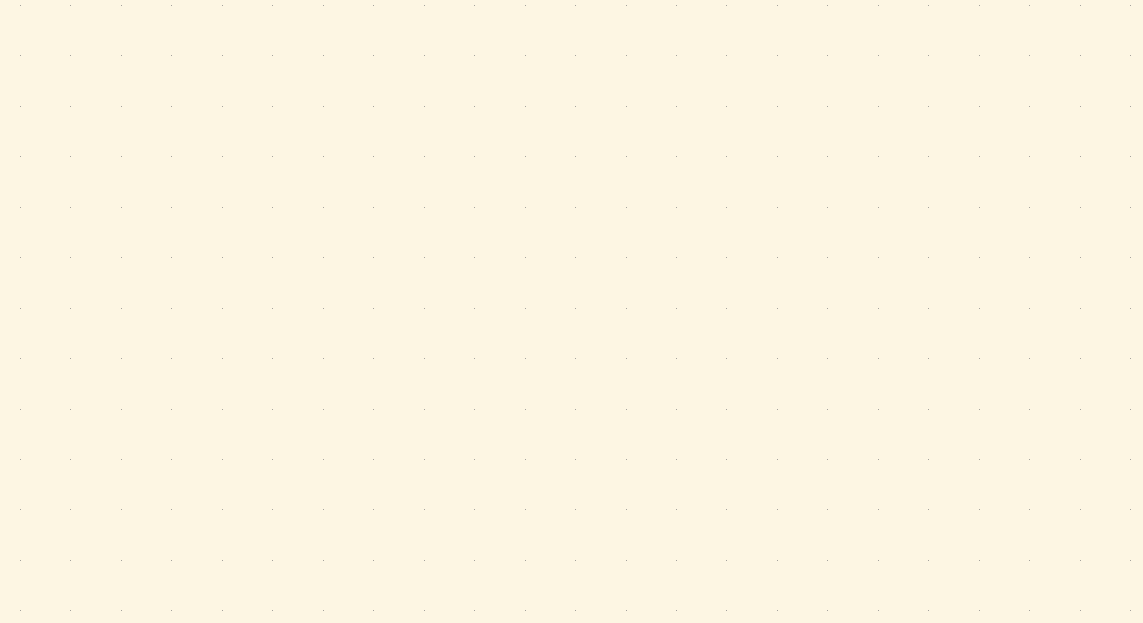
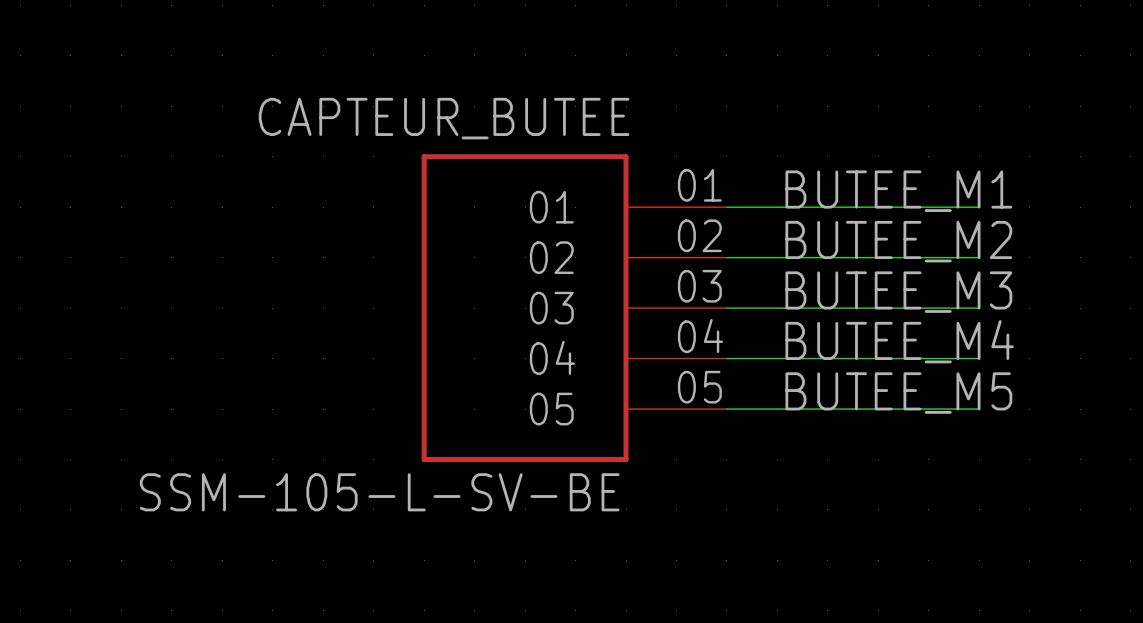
label: none -> BUTEE_M1 (898, 191)
wire: none -> (726, 207) (979, 207)
label: none -> BUTEE_M2 (898, 241)
wire: none -> (726, 257) (979, 257)
label: none -> BUTEE_M3 (898, 292)
CAPTEUR_BUTEE: none -> SSM-105-L-SV-BE (574, 308)
wire: none -> (726, 308) (979, 308)
label: none -> BUTEE_M4 (899, 341)
wire: none -> (726, 358) (979, 358)
label: none -> BUTEE_M5 (898, 393)
wire: none -> (726, 409) (979, 409)

